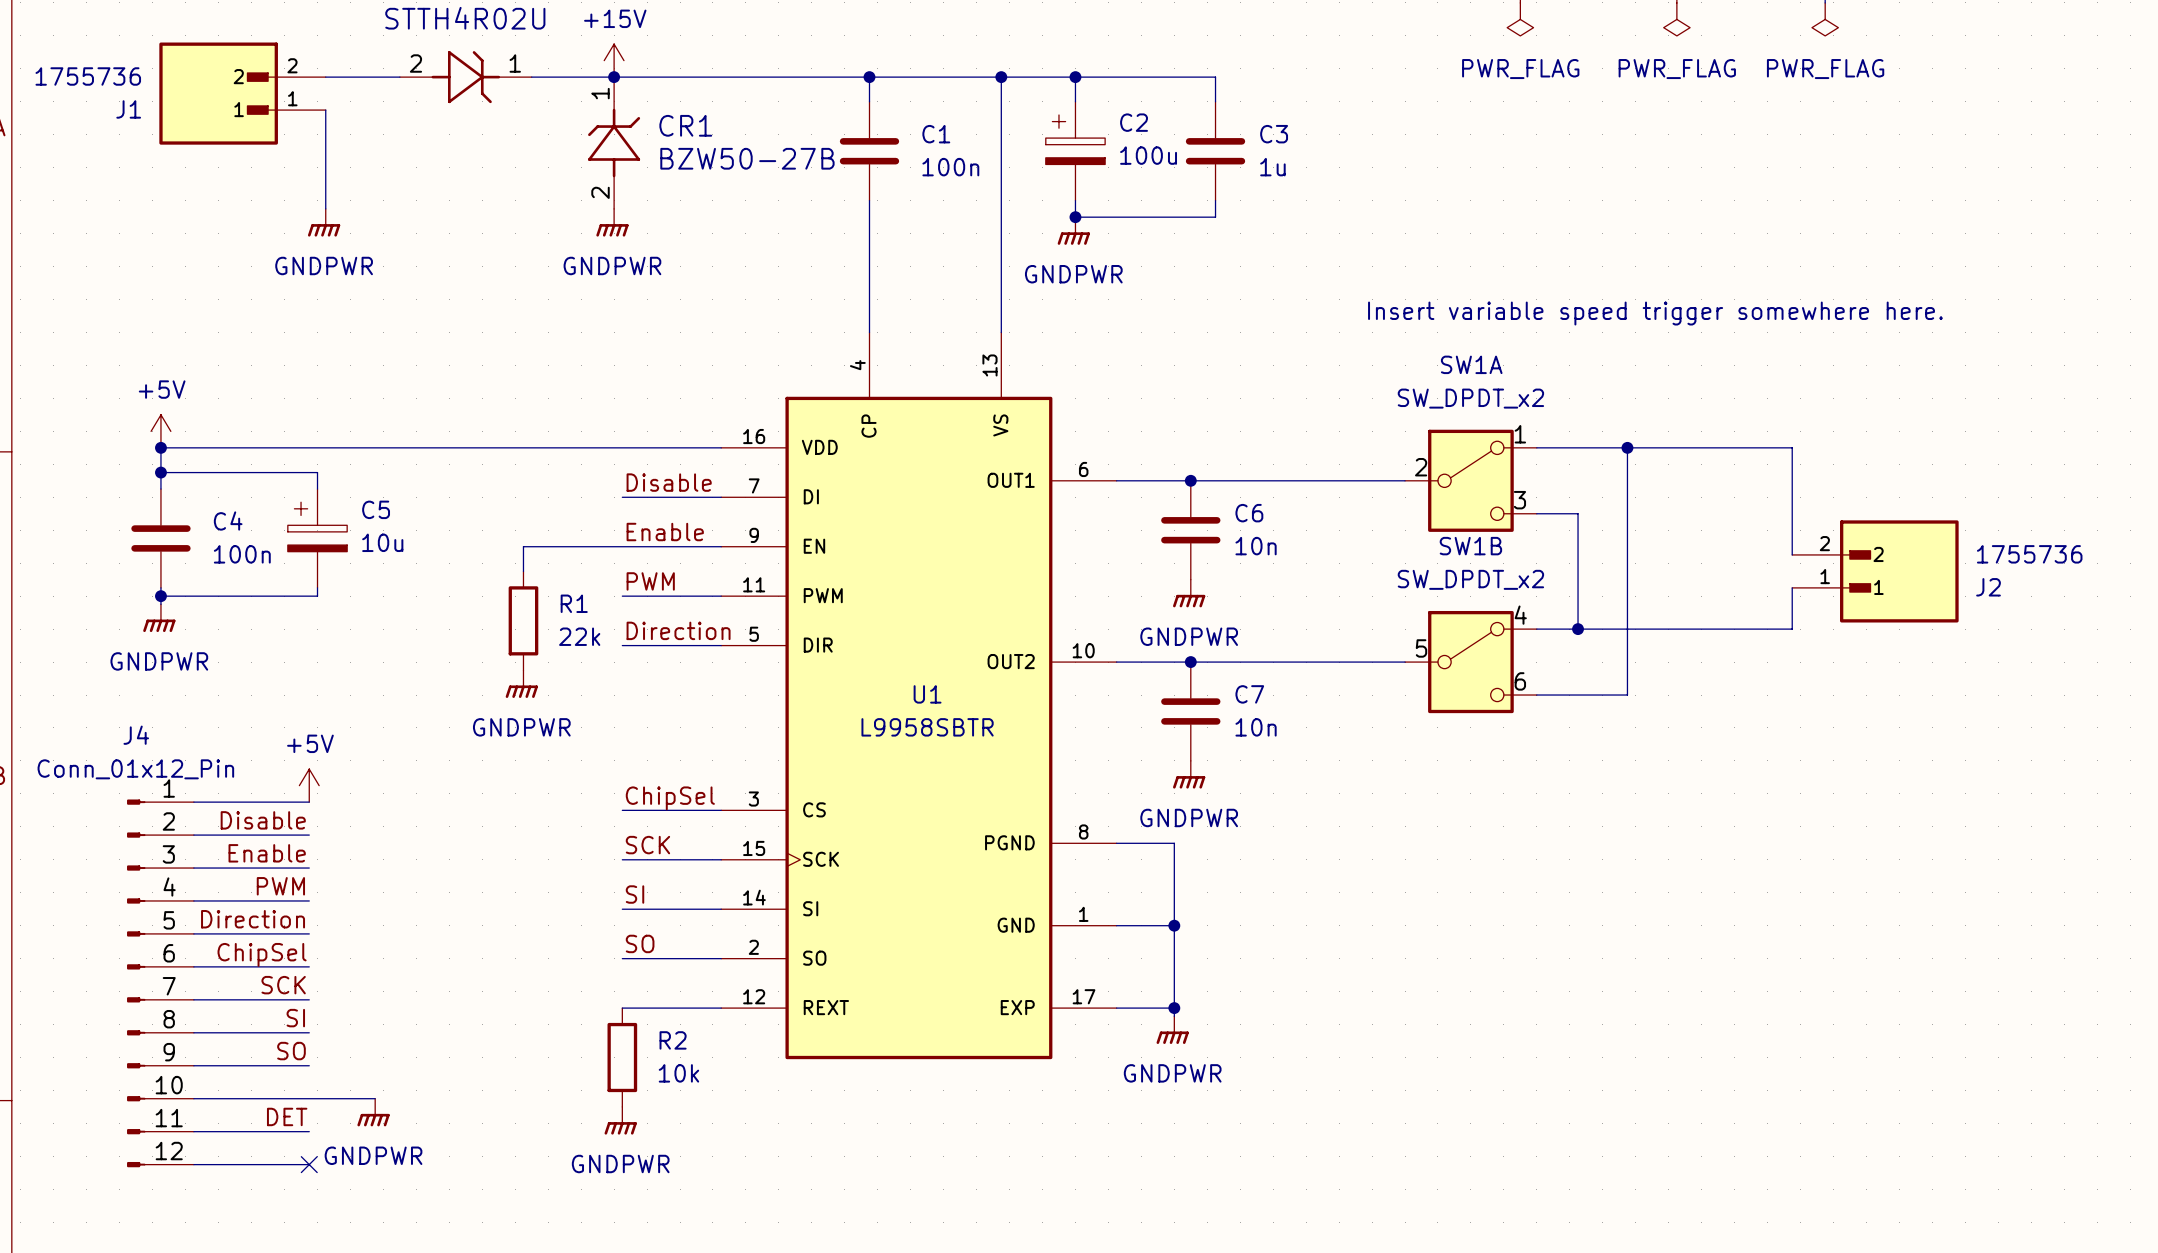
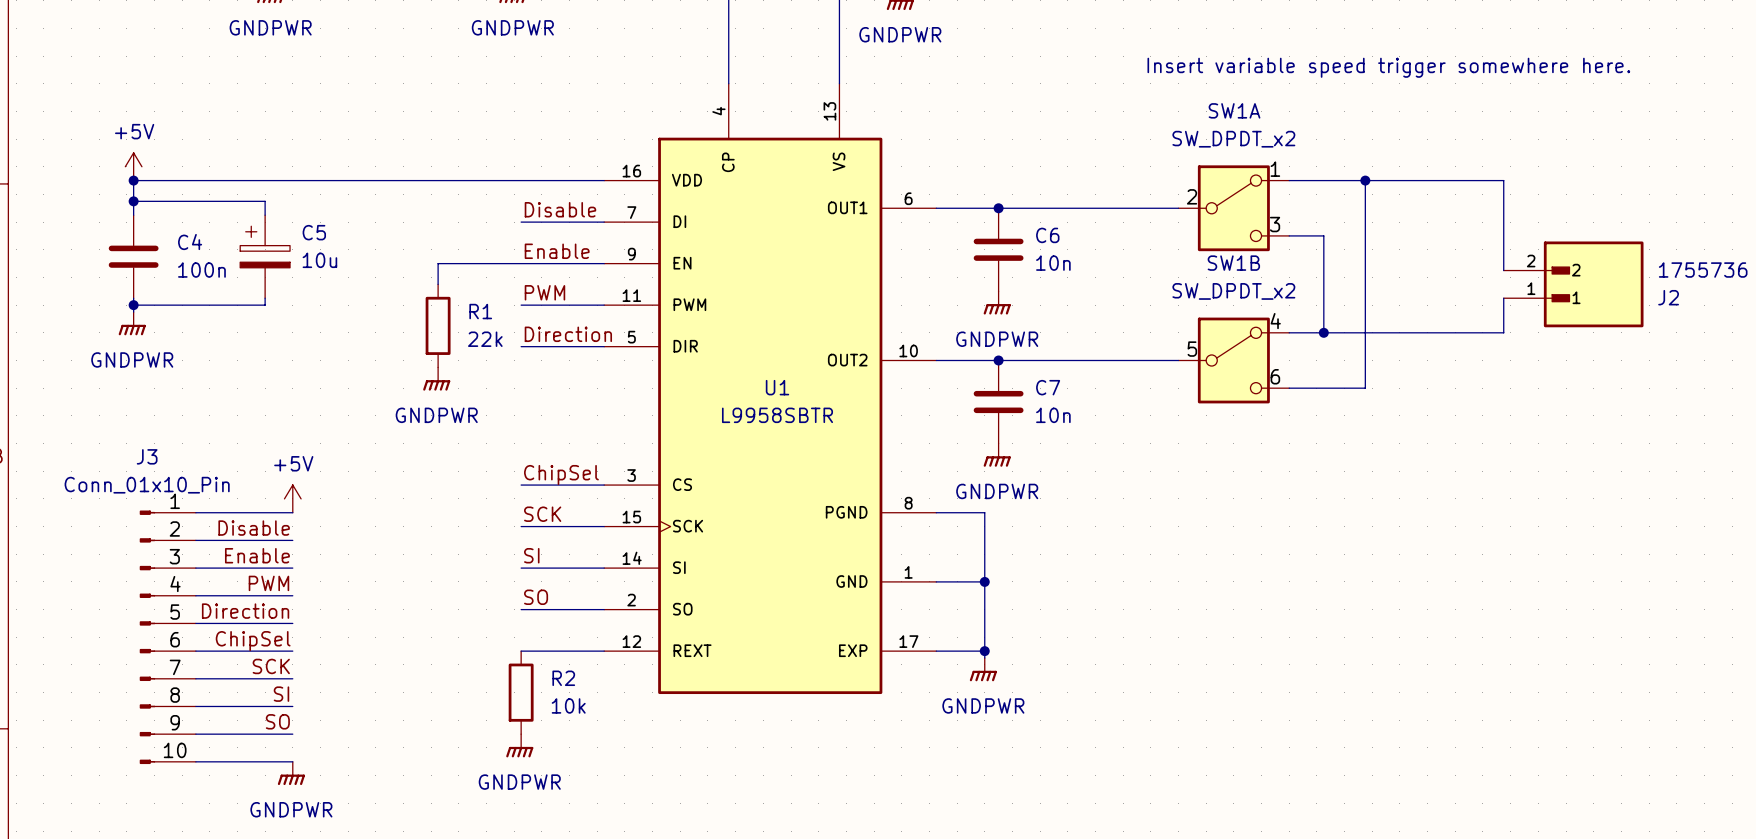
power symbol position: +5V (309, 785) -> +5V (292, 498)
wire: (193, 802) (309, 802) -> none
label position: Disable (263, 820) -> Disable (254, 528)
wire: (193, 835) (309, 835) -> (195, 512) (292, 512)
label position: Enable (267, 853) -> Enable (257, 555)
wire: (193, 868) (309, 868) -> (195, 540) (292, 540)
label position: PWM (280, 886) -> PWM (268, 583)
wire: (193, 900) (309, 900) -> (195, 568) (292, 568)
label position: Direction (253, 919) -> Direction (245, 611)
wire: (193, 933) (309, 933) -> (195, 595) (292, 595)
label position: ChipSel (262, 954) -> ChipSel (253, 641)
wire: (193, 966) (309, 966) -> (195, 623) (292, 623)
J4: Conn_01x12_Pin (160, 983) -> none
label position: SCK (283, 985) -> SCK (271, 666)
J3: none -> Conn_01x10_Pin (167, 637)
wire: (193, 999) (309, 999) -> (195, 651) (292, 651)
label position: SI (295, 1018) -> SI (281, 694)
wire: (193, 1032) (309, 1032) -> (195, 678) (292, 678)
label position: SO (291, 1051) -> SO (277, 721)
wire: (193, 1065) (309, 1065) -> (195, 706) (292, 706)
wire: (193, 1098) (375, 1098) -> none
power symbol position: GNDPWR (373, 1112) -> GNDPWR (291, 773)
label: DET (287, 1116) -> none
wire: (193, 1131) (309, 1131) -> (195, 761) (292, 761)
wire: (193, 1164) (309, 1164) -> (195, 734) (292, 734)
no-connect mark: (309, 1164) -> none

